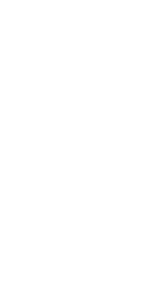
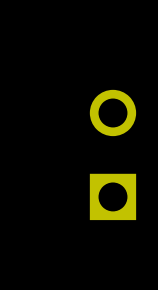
part: none -> (112, 154)

